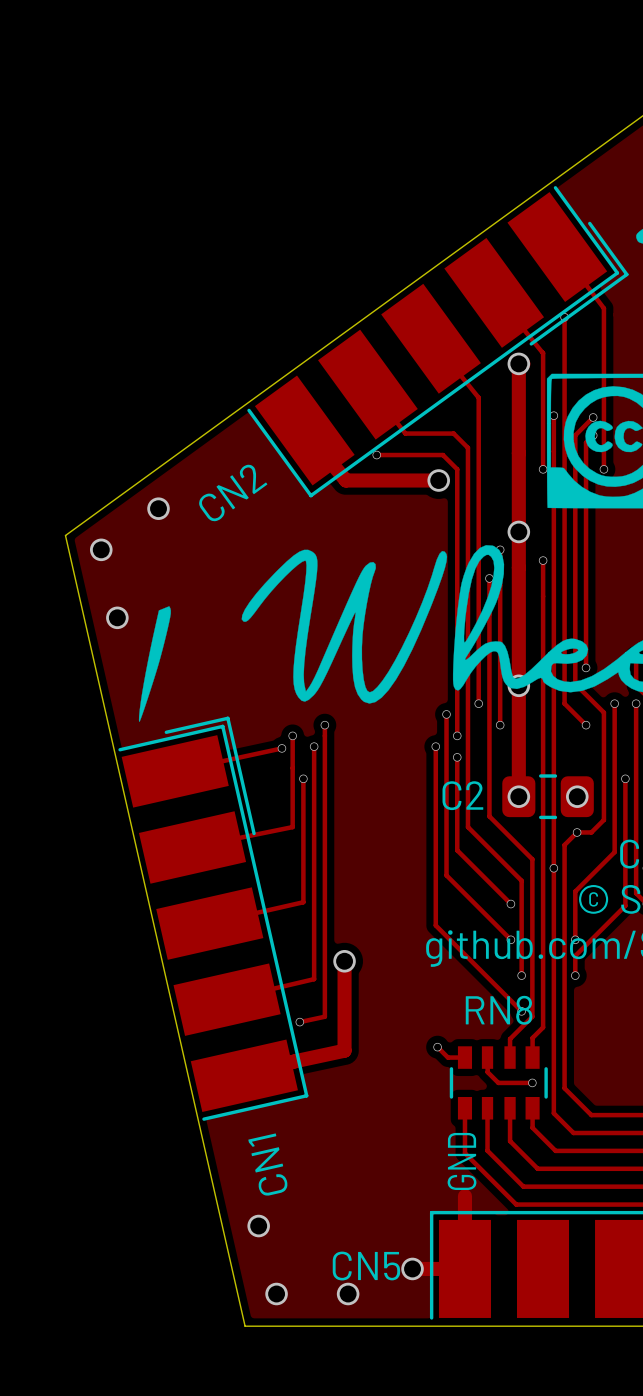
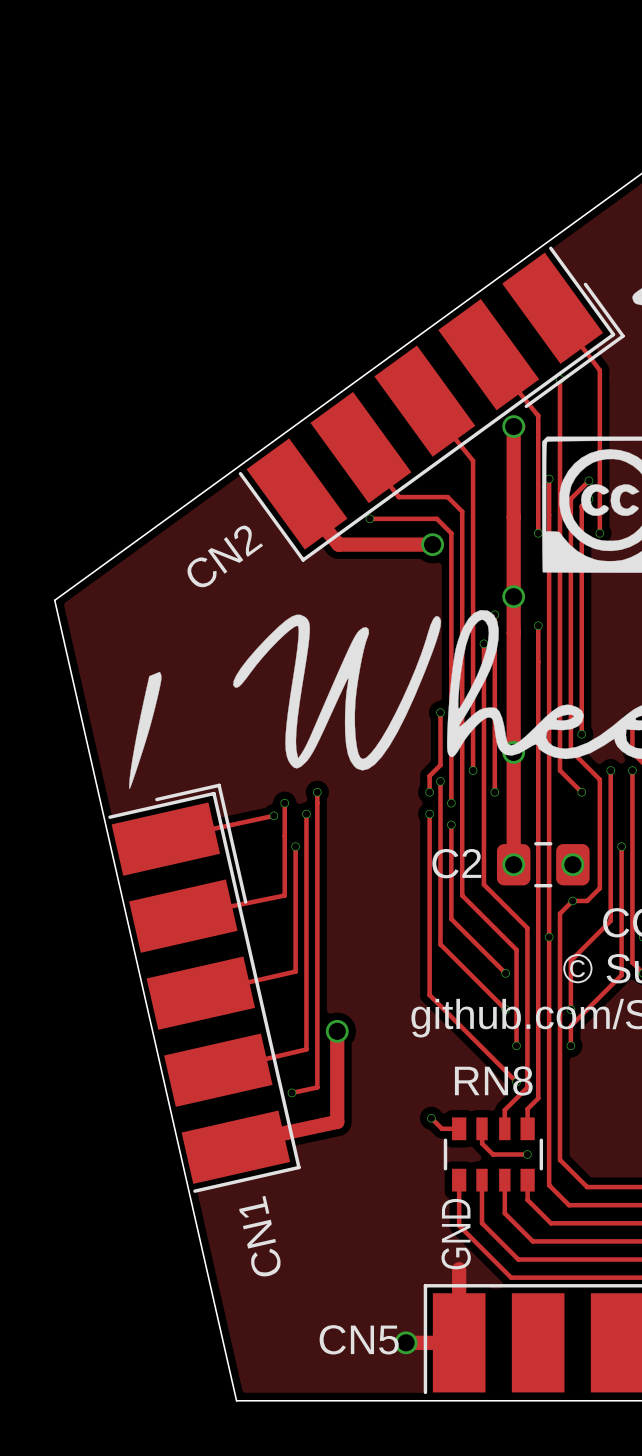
via: (158, 508) -> none
via: (101, 549) -> none
via: (117, 617) -> none
track: none -> (440, 712) (440, 765) (429, 775) (429, 792)
via: none -> (440, 712)
via: none -> (429, 792)
via: (258, 1226) -> none
via: (276, 1294) -> none
via: (348, 1294) -> none

